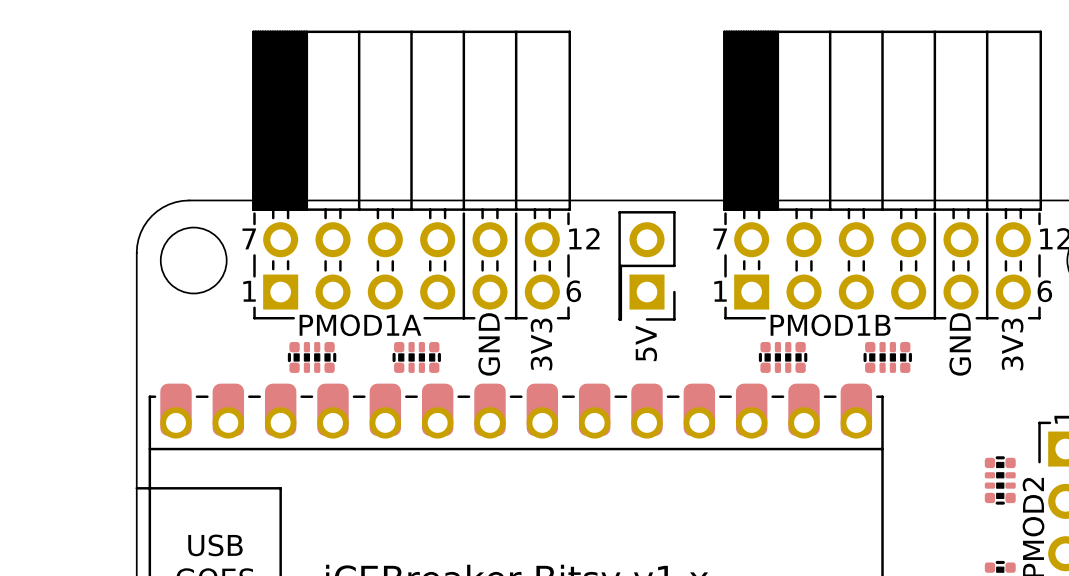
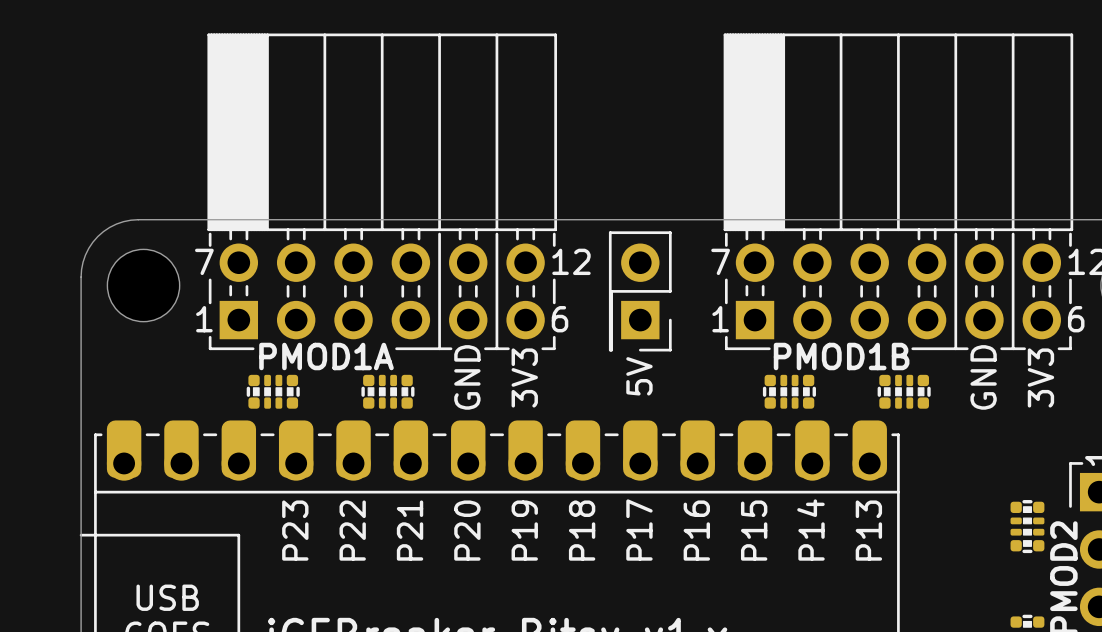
text: none -> P23 (295, 530)
text: none -> P20 (467, 530)
text: none -> P19 (524, 530)
text: none -> P18 (582, 530)
text: none -> P17 (639, 530)
text: none -> P16 (696, 530)
text: none -> P14 (810, 530)
text: none -> P13 (868, 530)
text: none -> P22 (352, 530)
text: none -> P21 (410, 530)
text: none -> P15 (754, 530)

